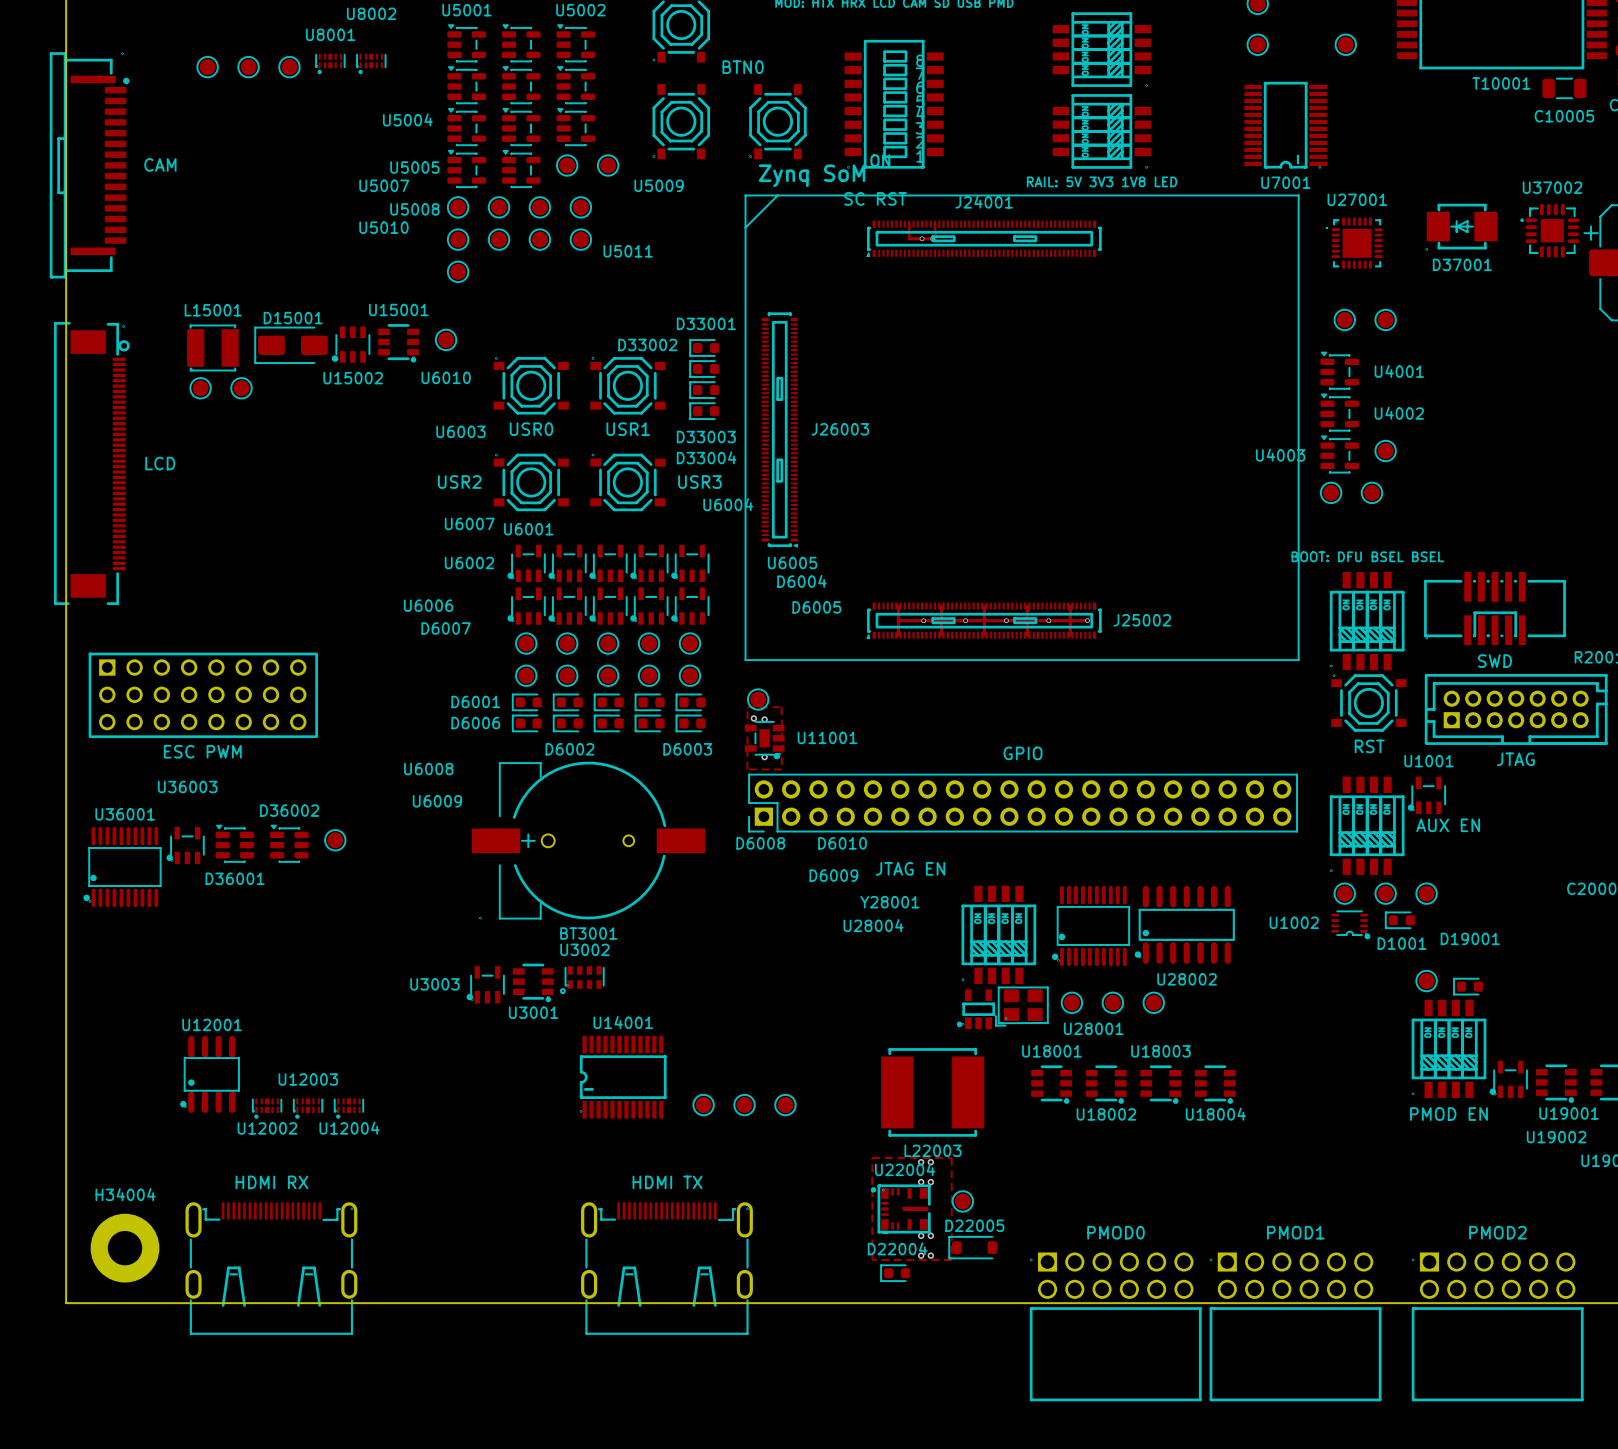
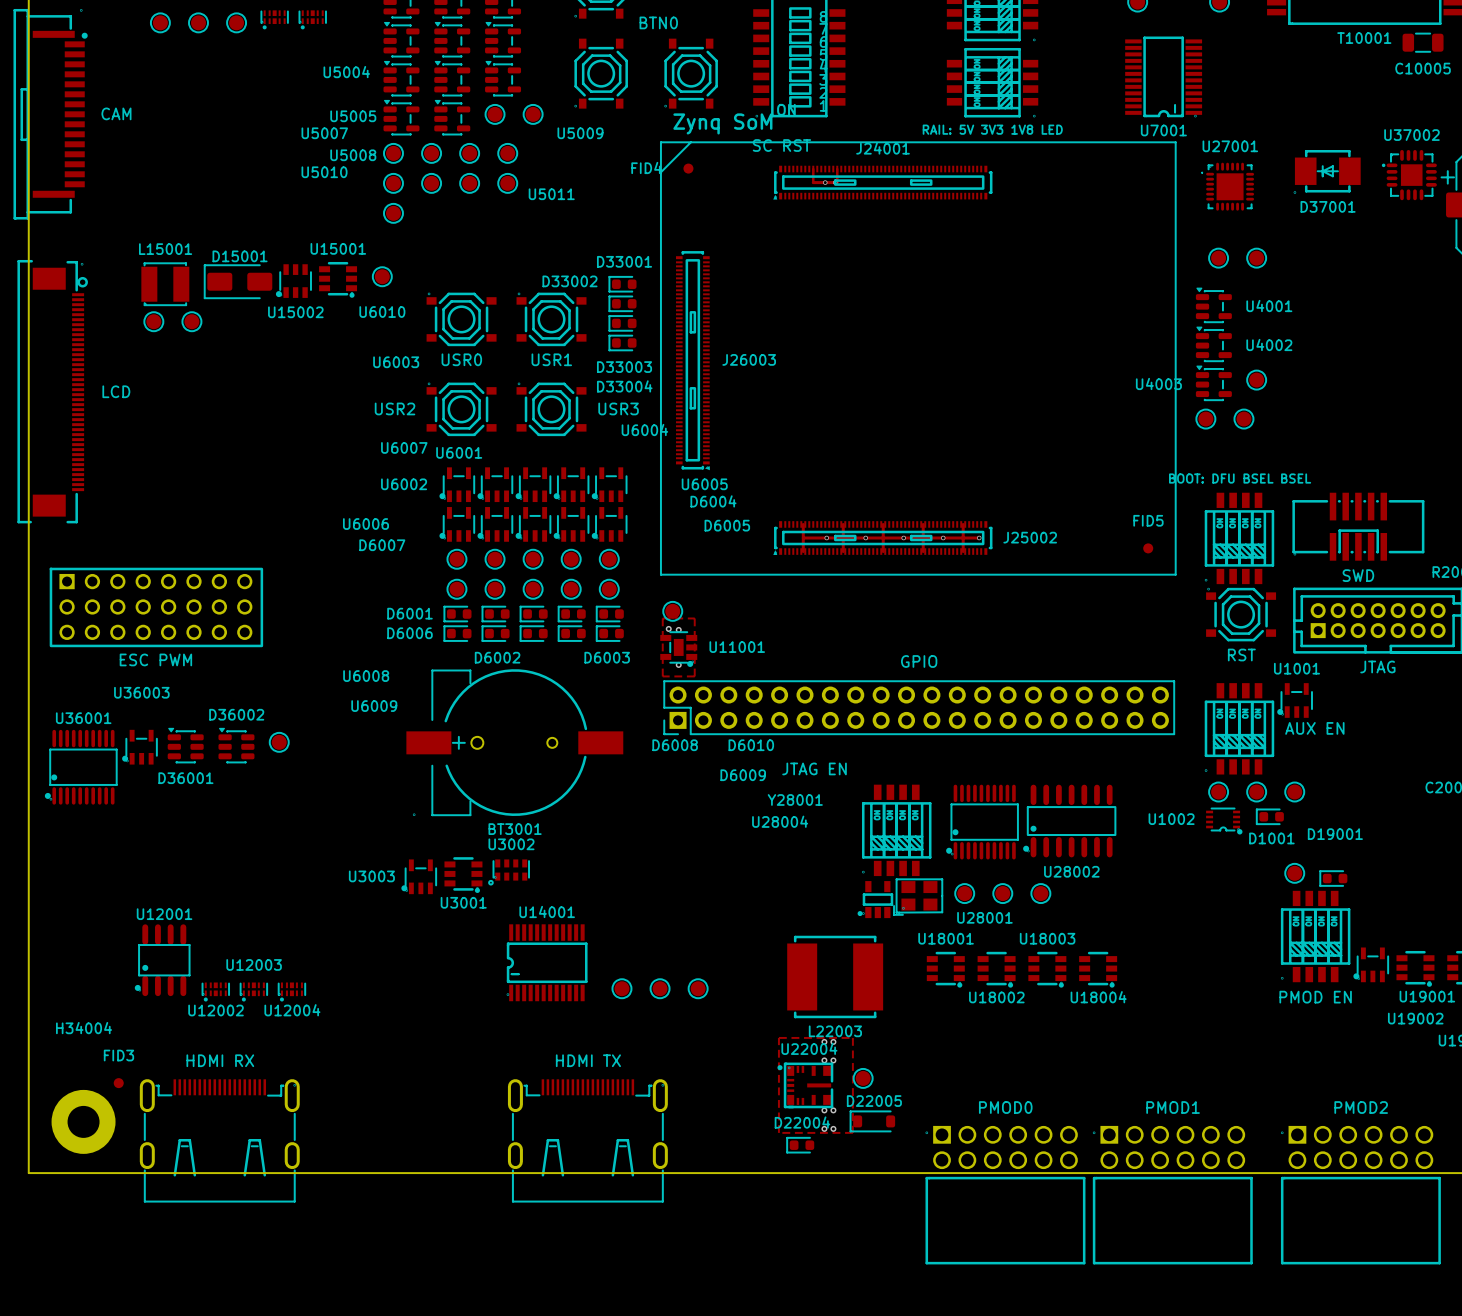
FID4: none -> (688, 168)
FID5: none -> (1148, 548)
H34004 name position: H34004 (125, 1194) -> H34004 (84, 1028)
FID3: none -> (118, 1083)

